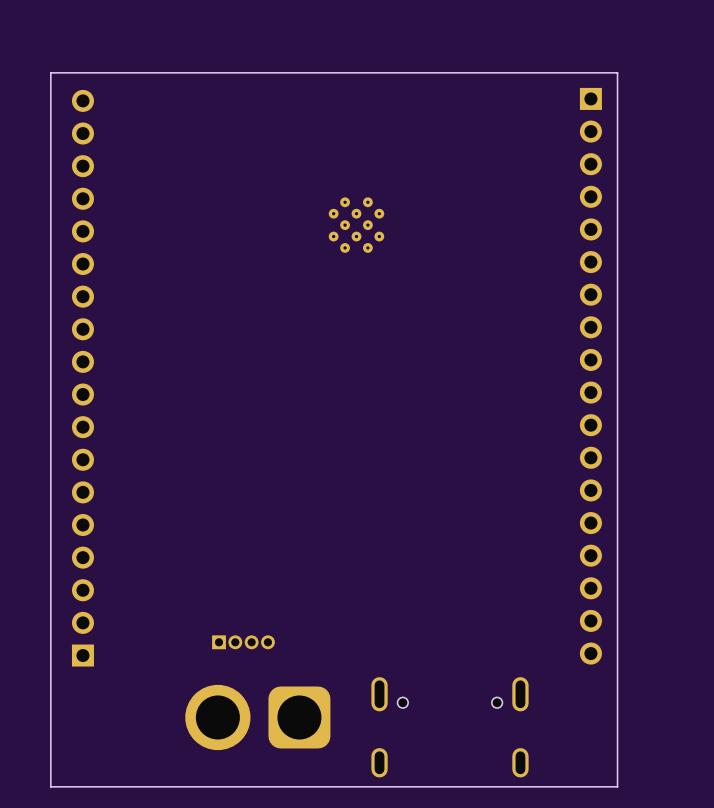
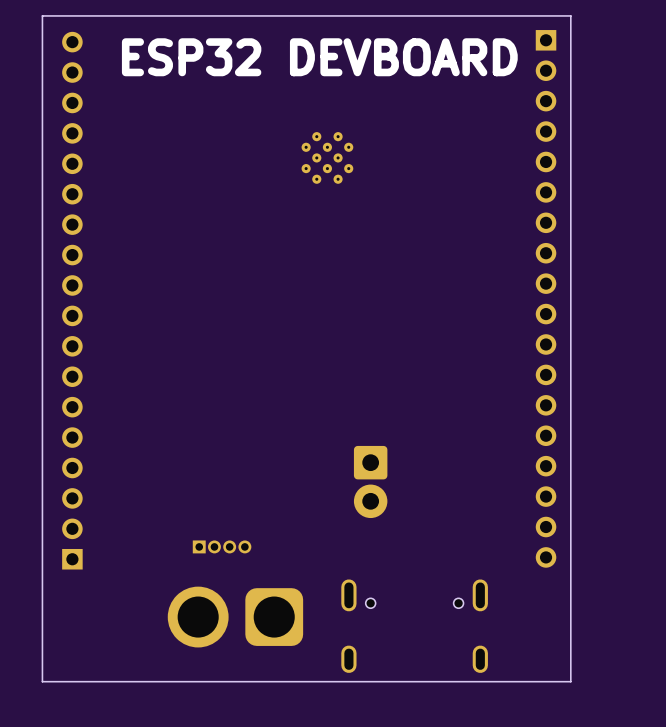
text: none -> ESP32 DEVBOARD (319, 57)
part: none -> (370, 481)

